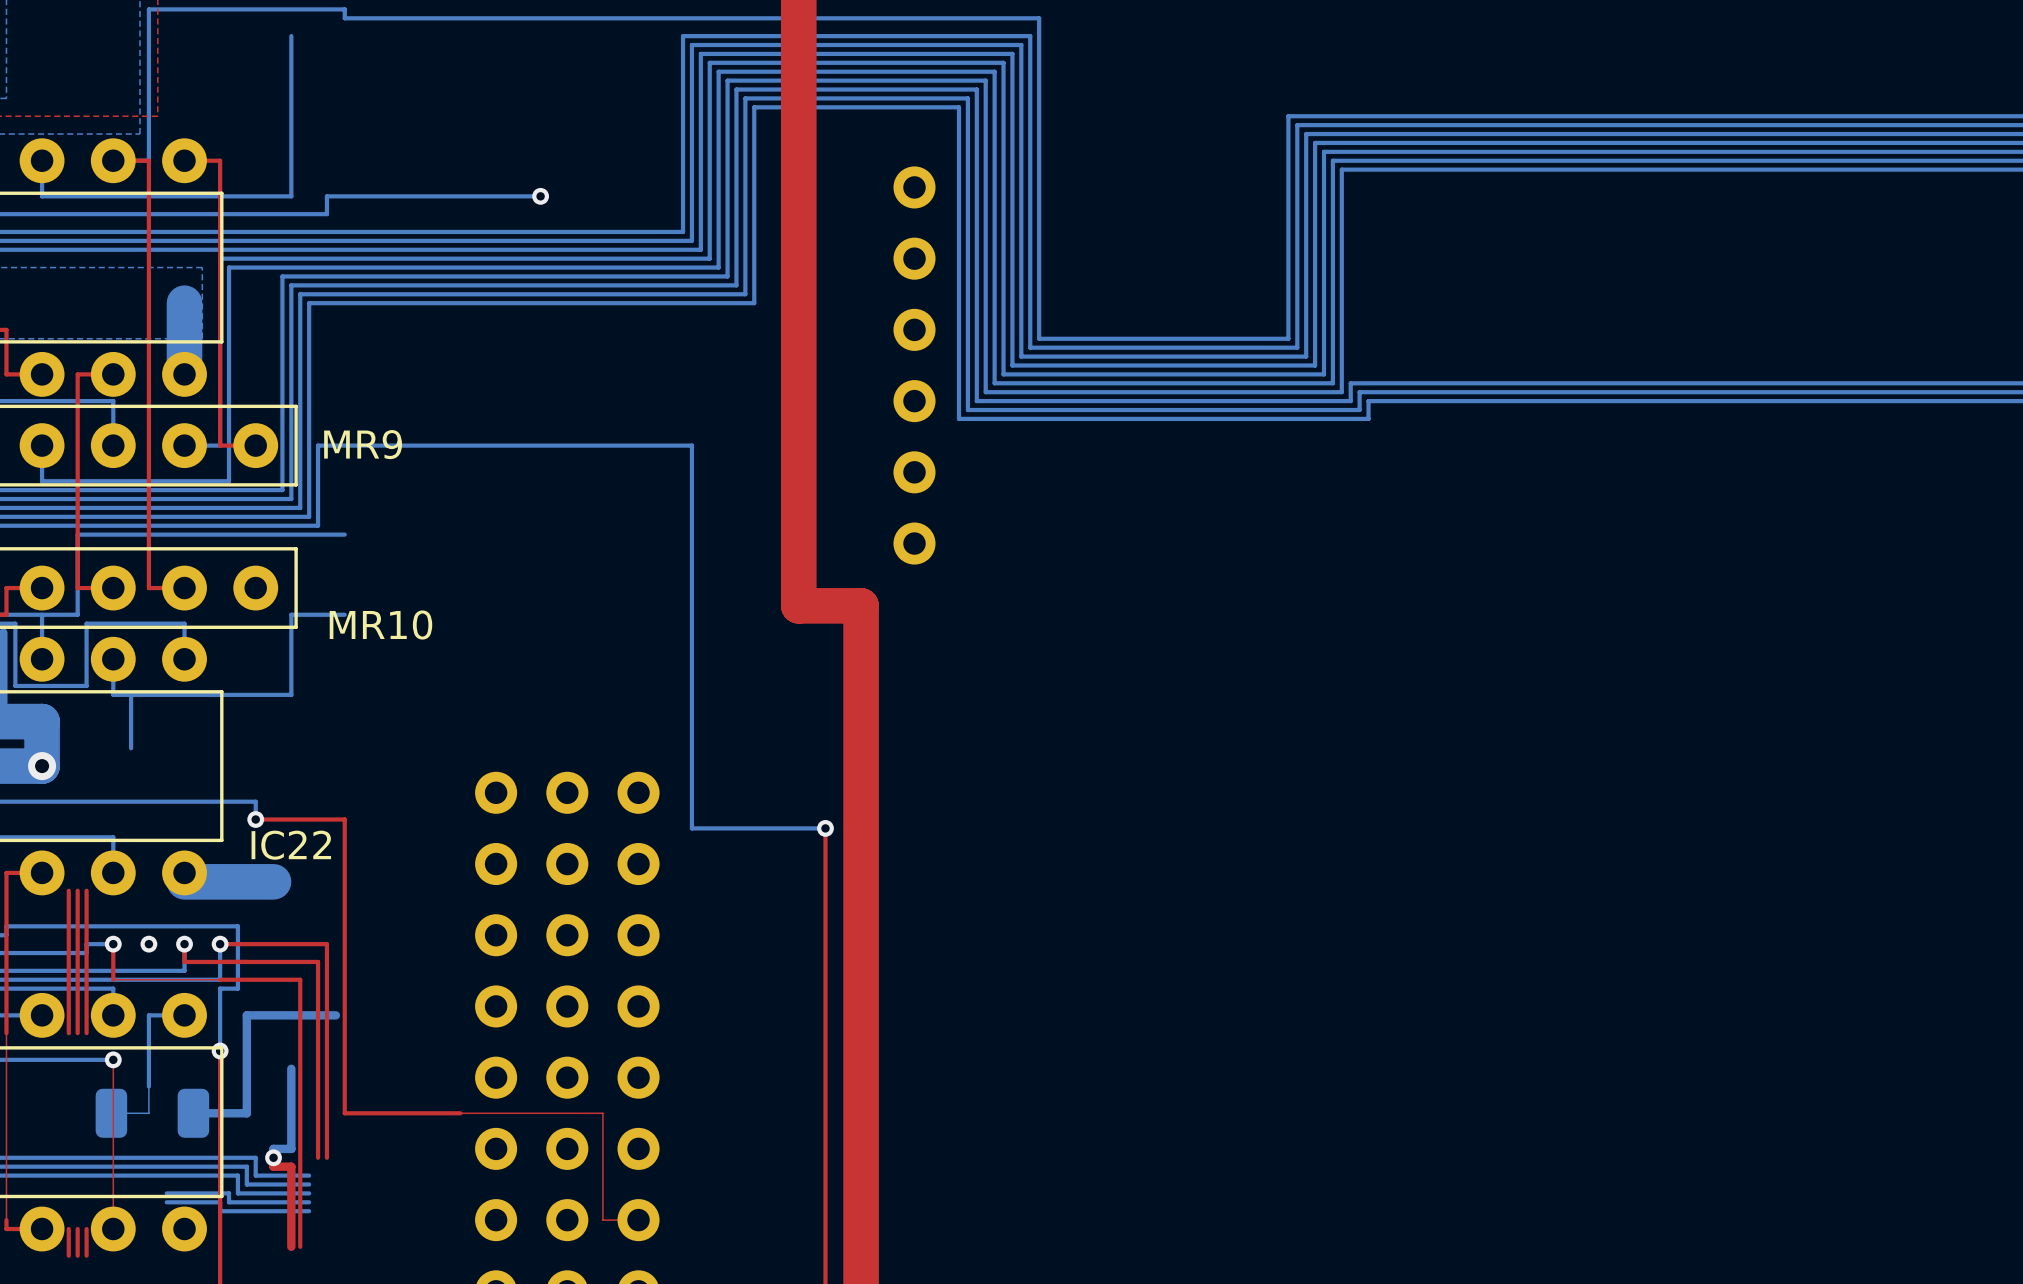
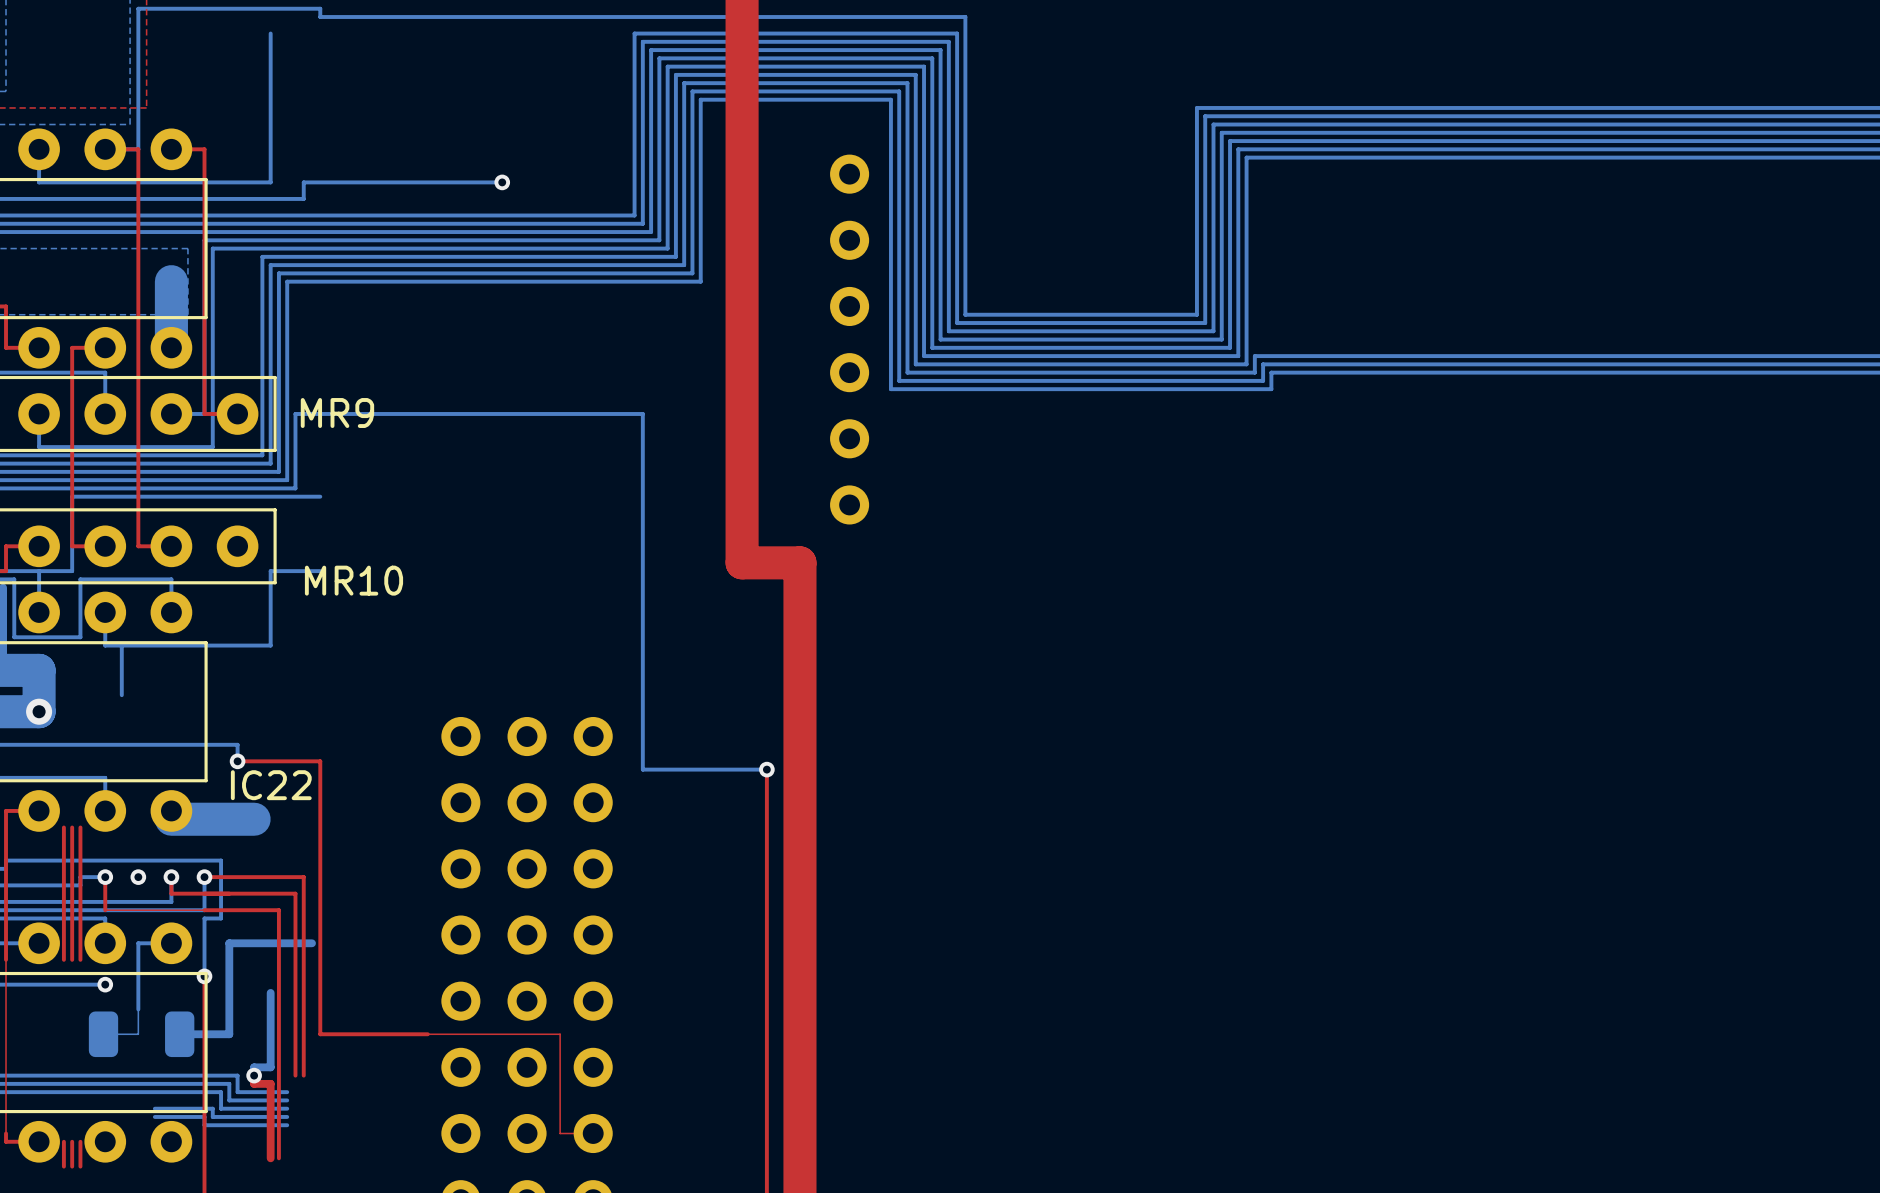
top track: (113, 1059) (113, 1229) -> none

